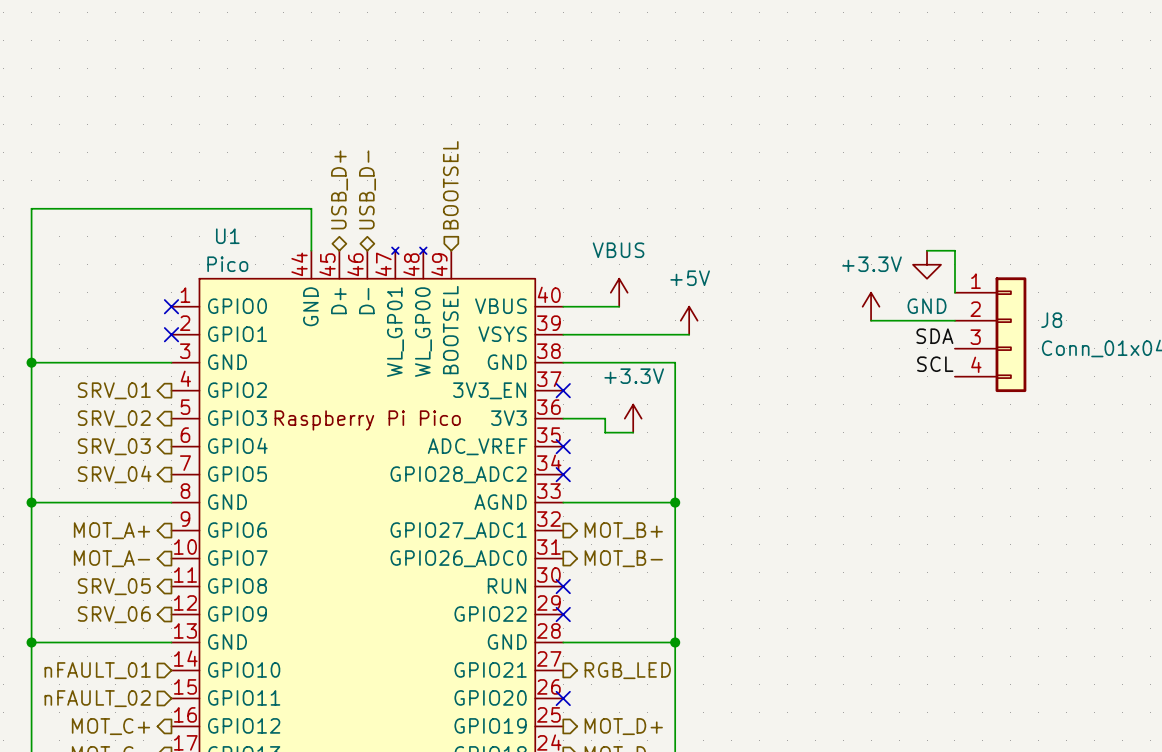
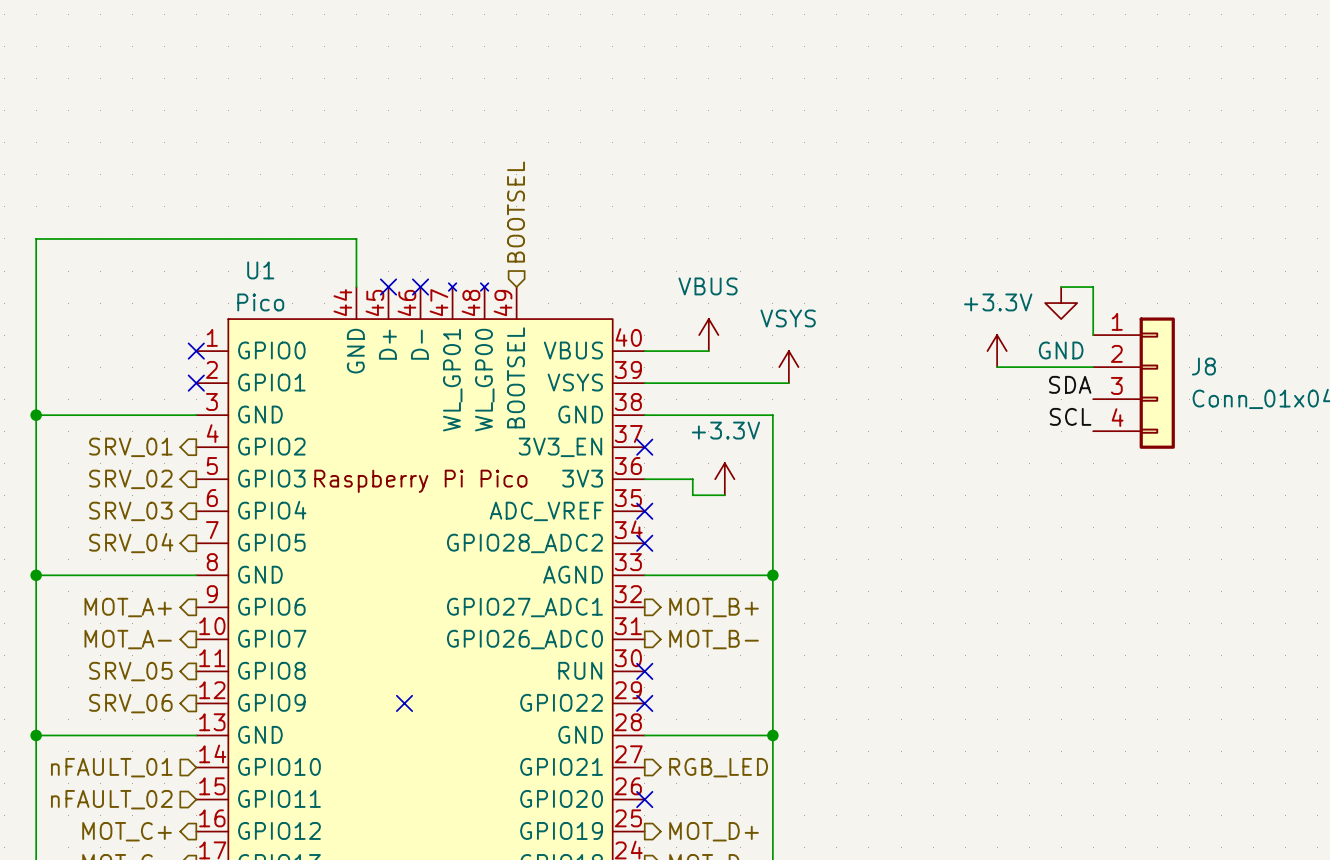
hierarchical label: USB_D+ (339, 189) -> none
hierarchical label: USB_D- (367, 189) -> none
no-connect mark: none -> (388, 287)
no-connect mark: none -> (420, 287)
power symbol: +5V (689, 320) -> VSYS (788, 367)
no-connect mark: none -> (404, 703)

